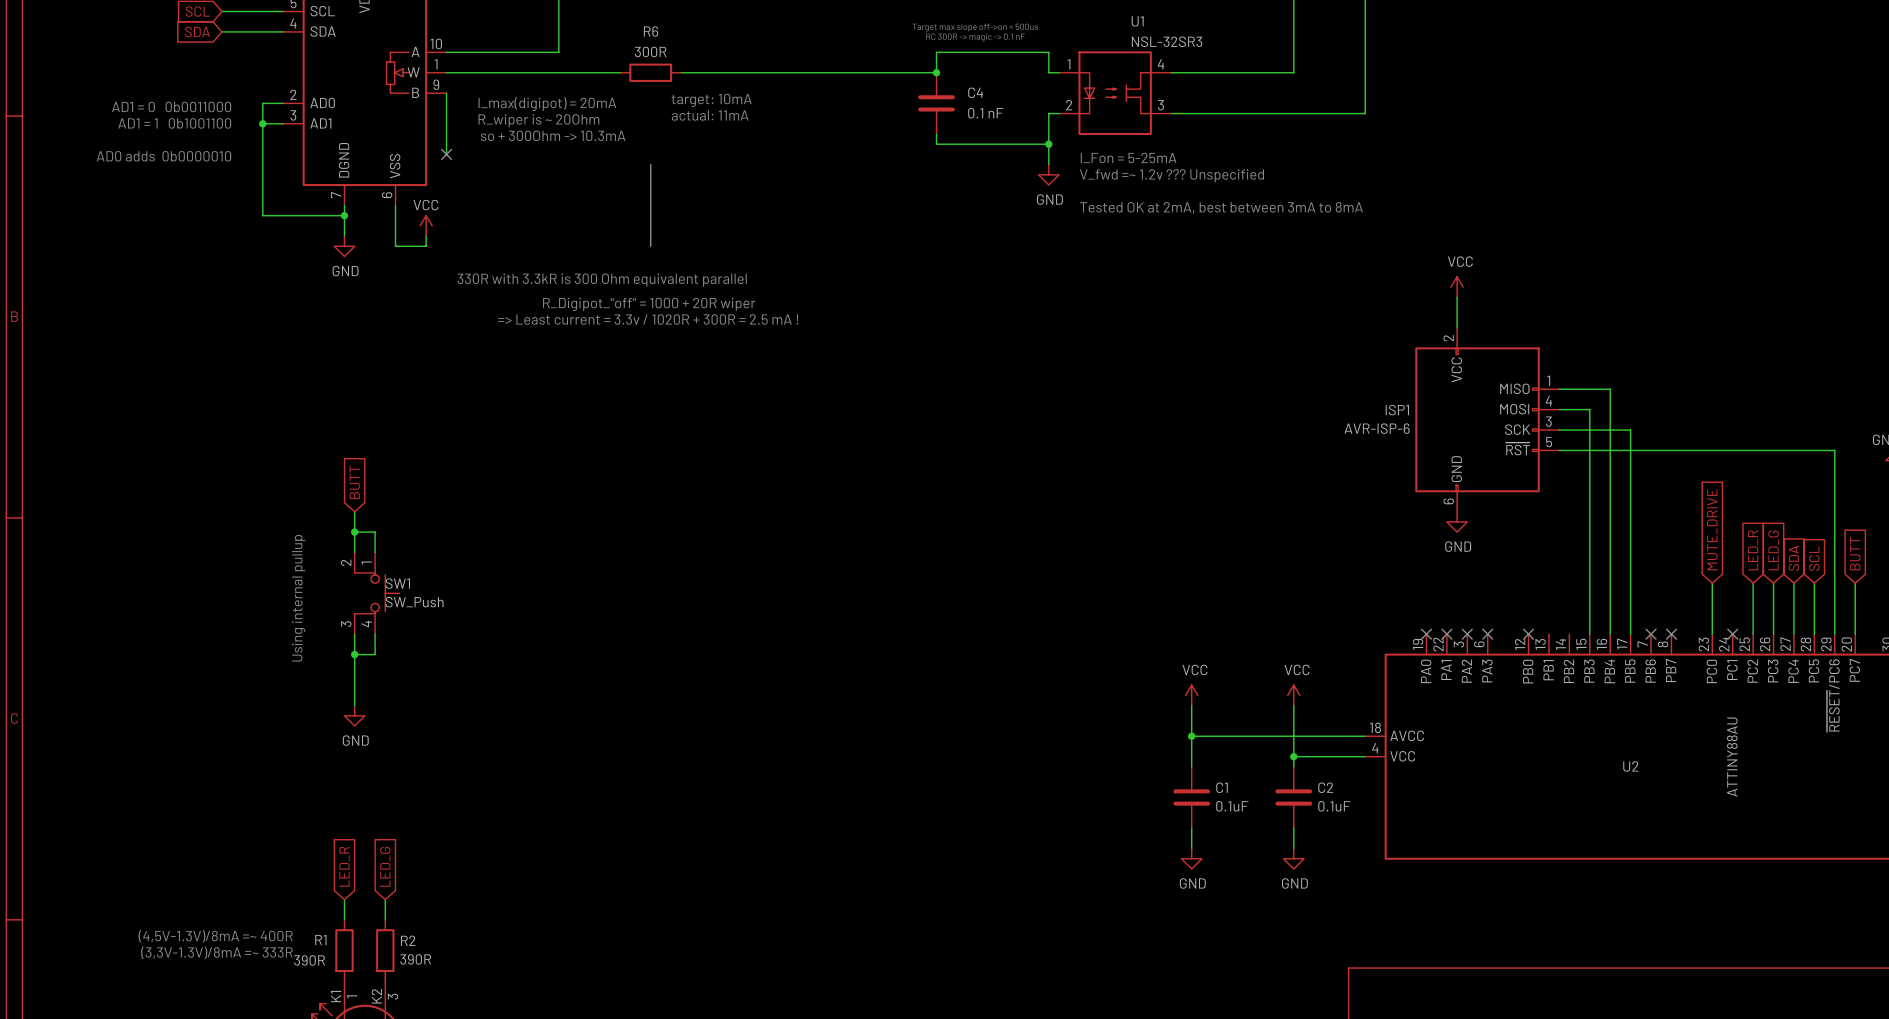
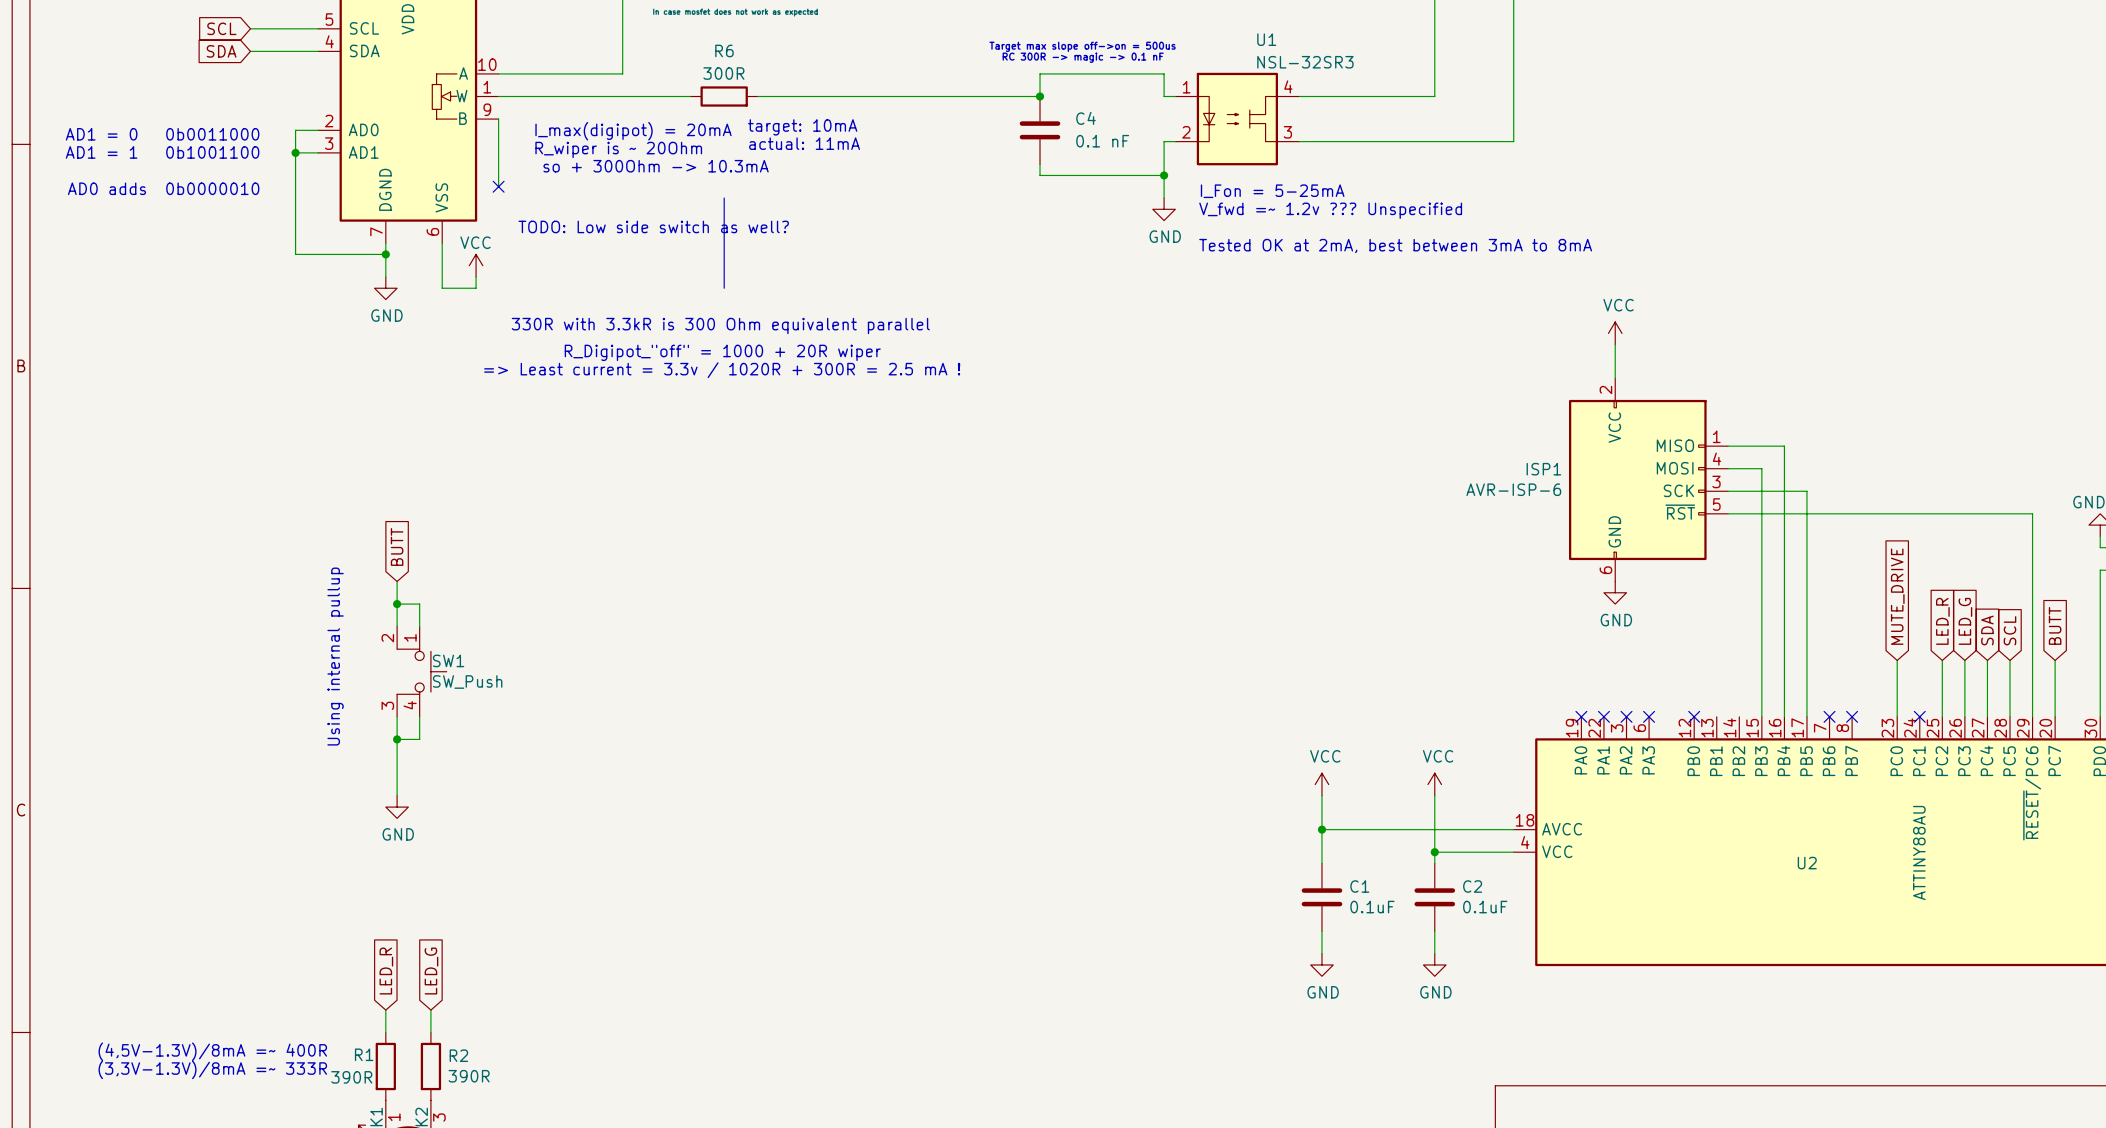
text: none -> TODO: Low side switch as well? (653, 226)

